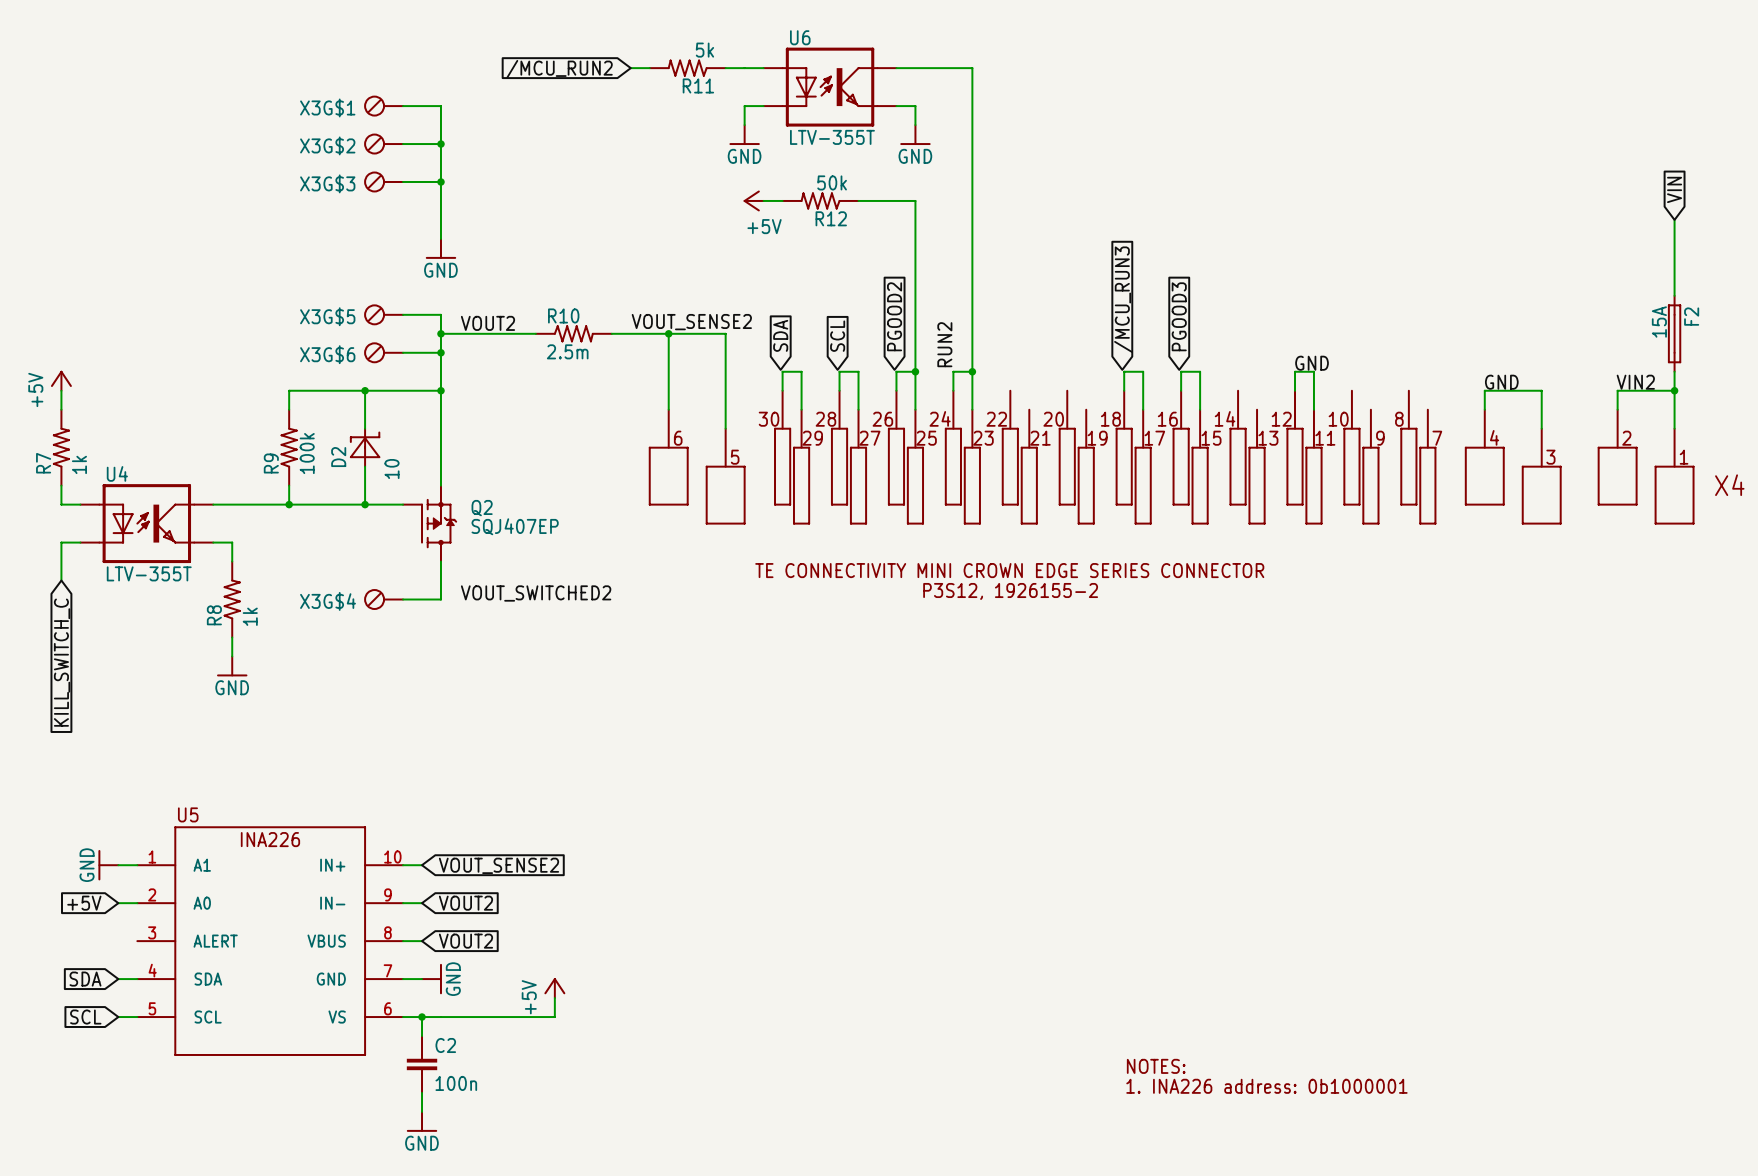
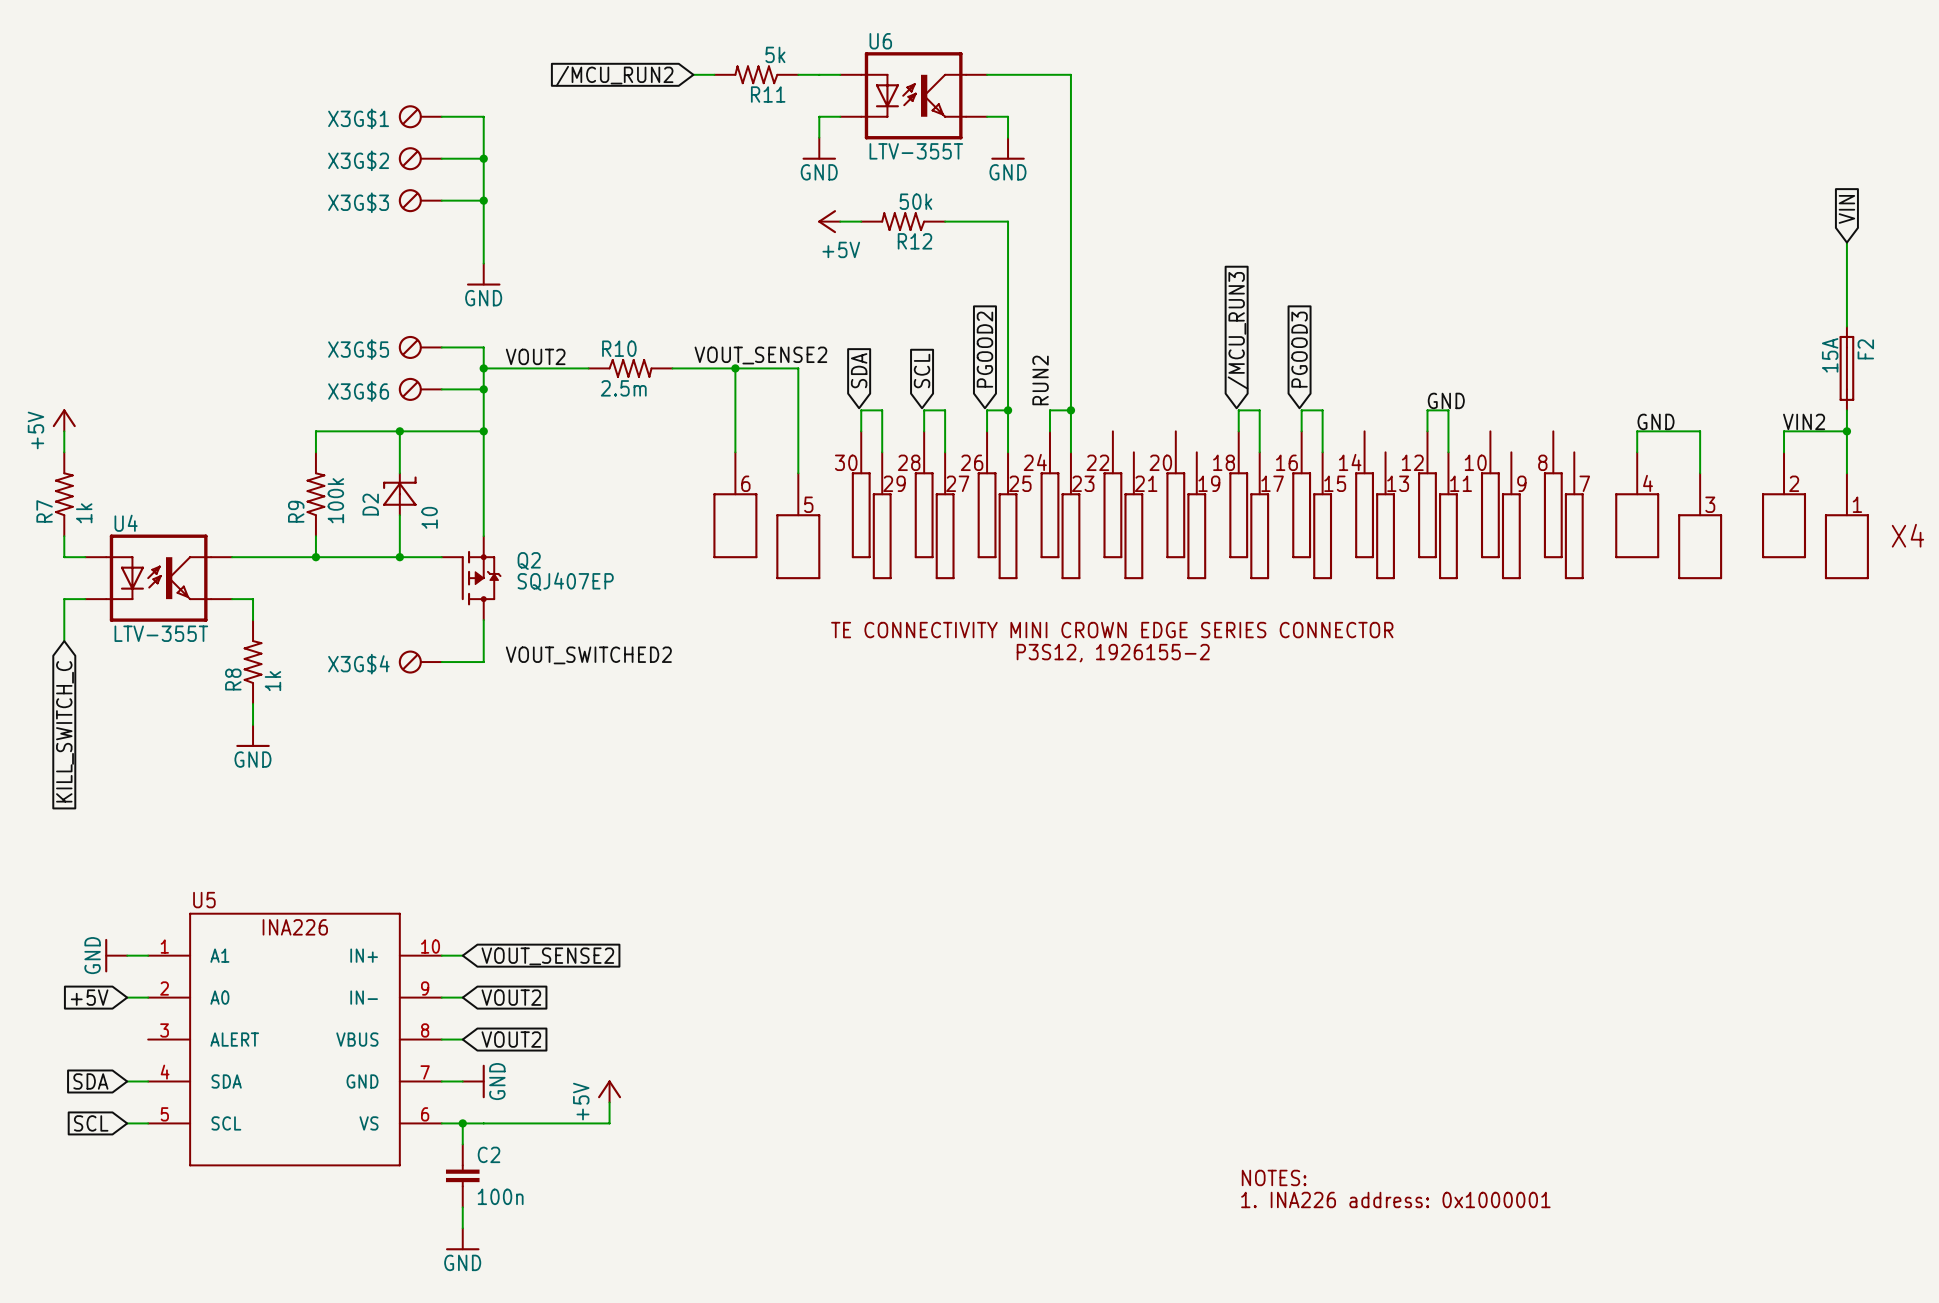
text: 1. INA226 address: 0b1000001 (1266, 1086) -> 1. INA226 address: 0x1000001 (1395, 1199)

